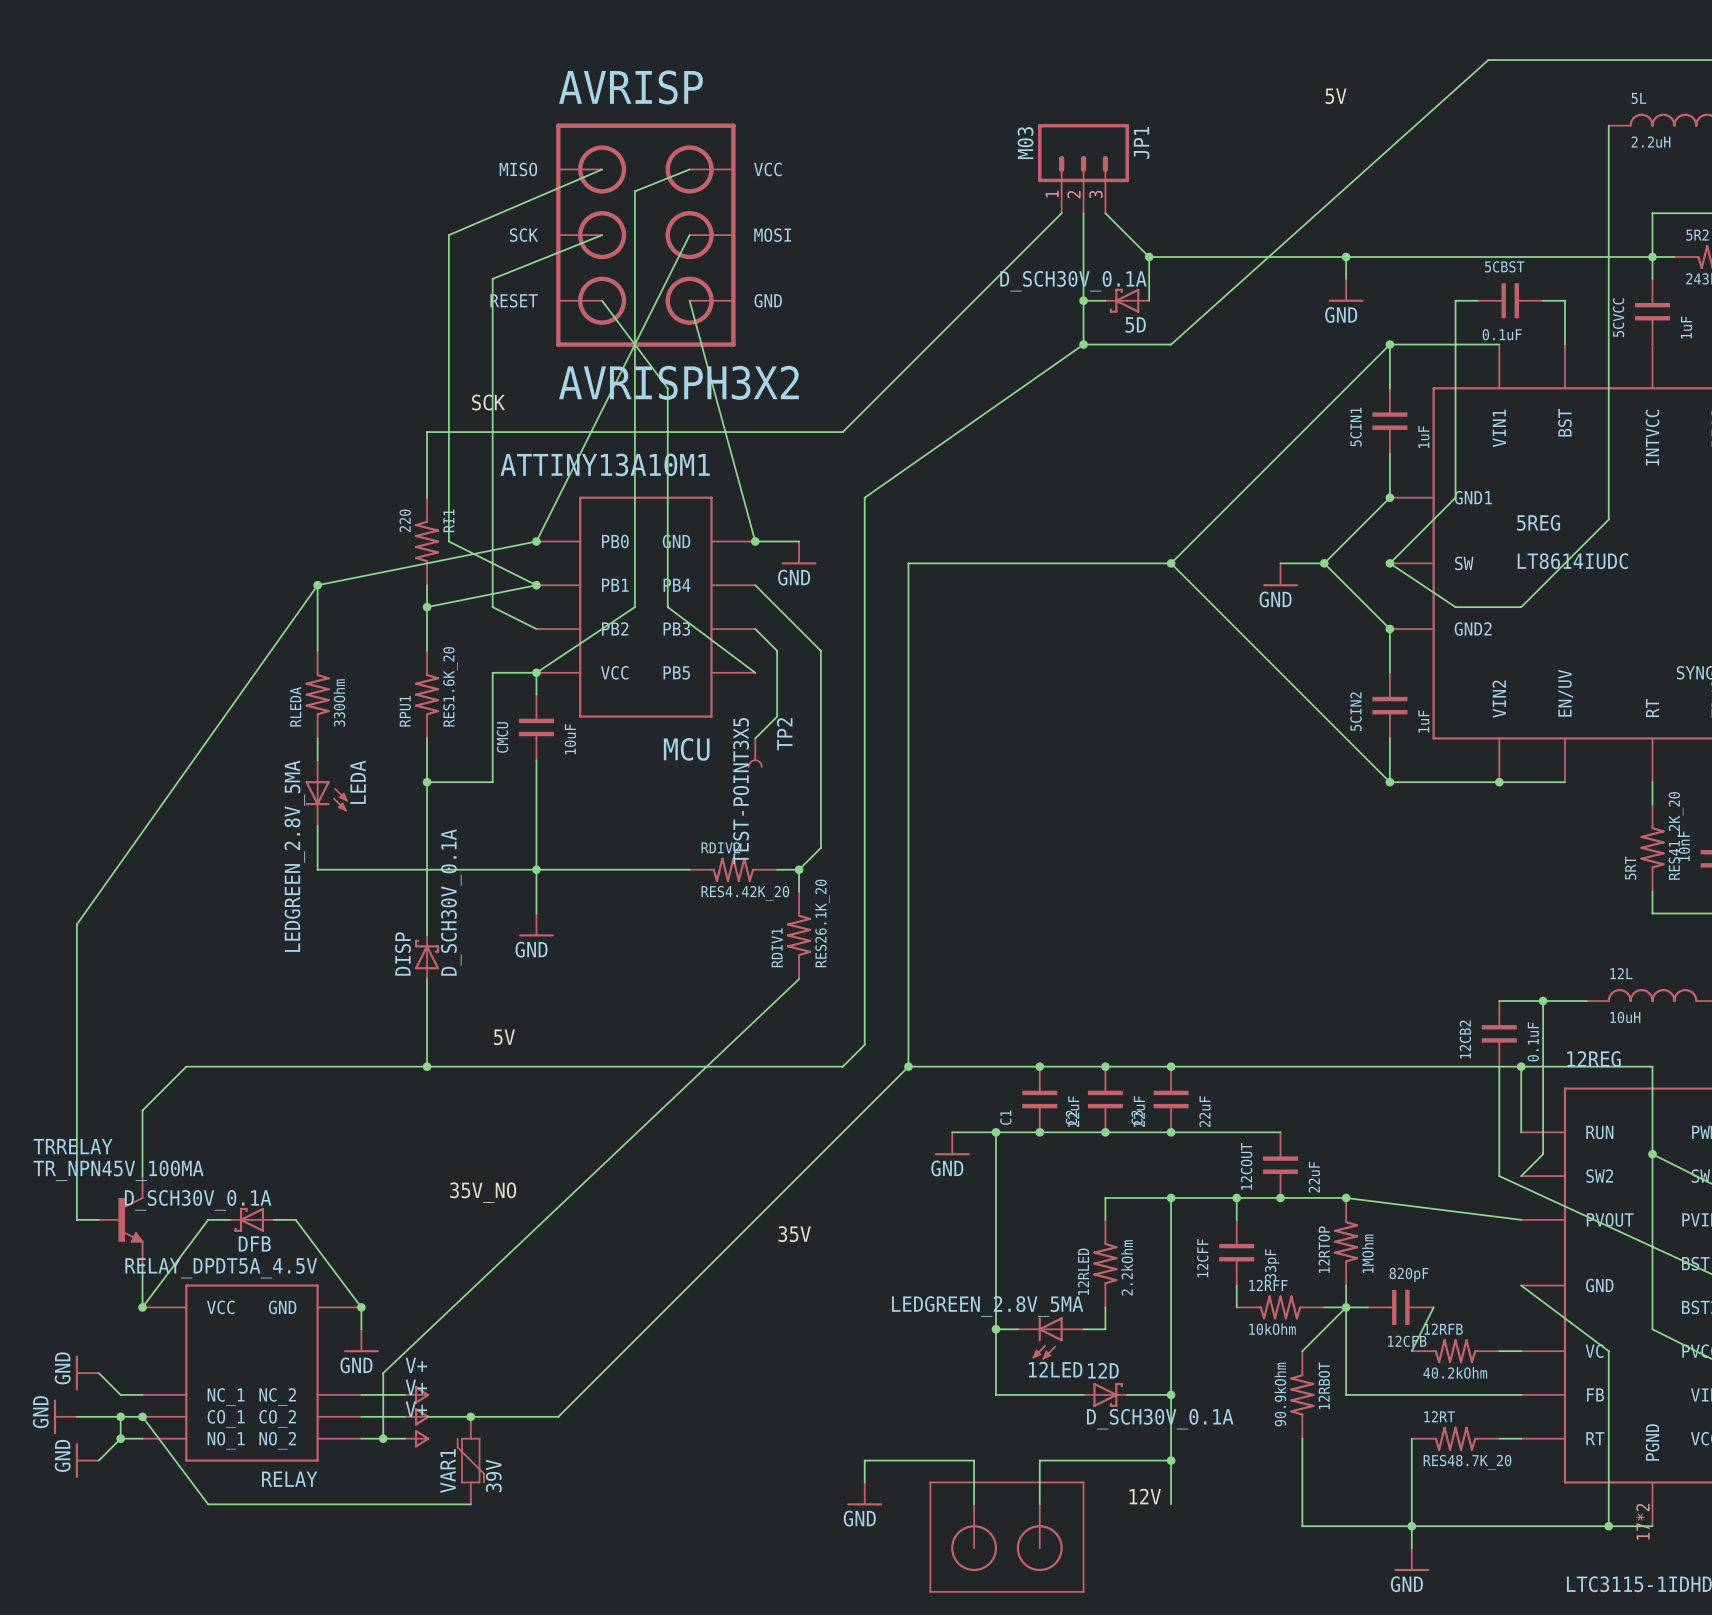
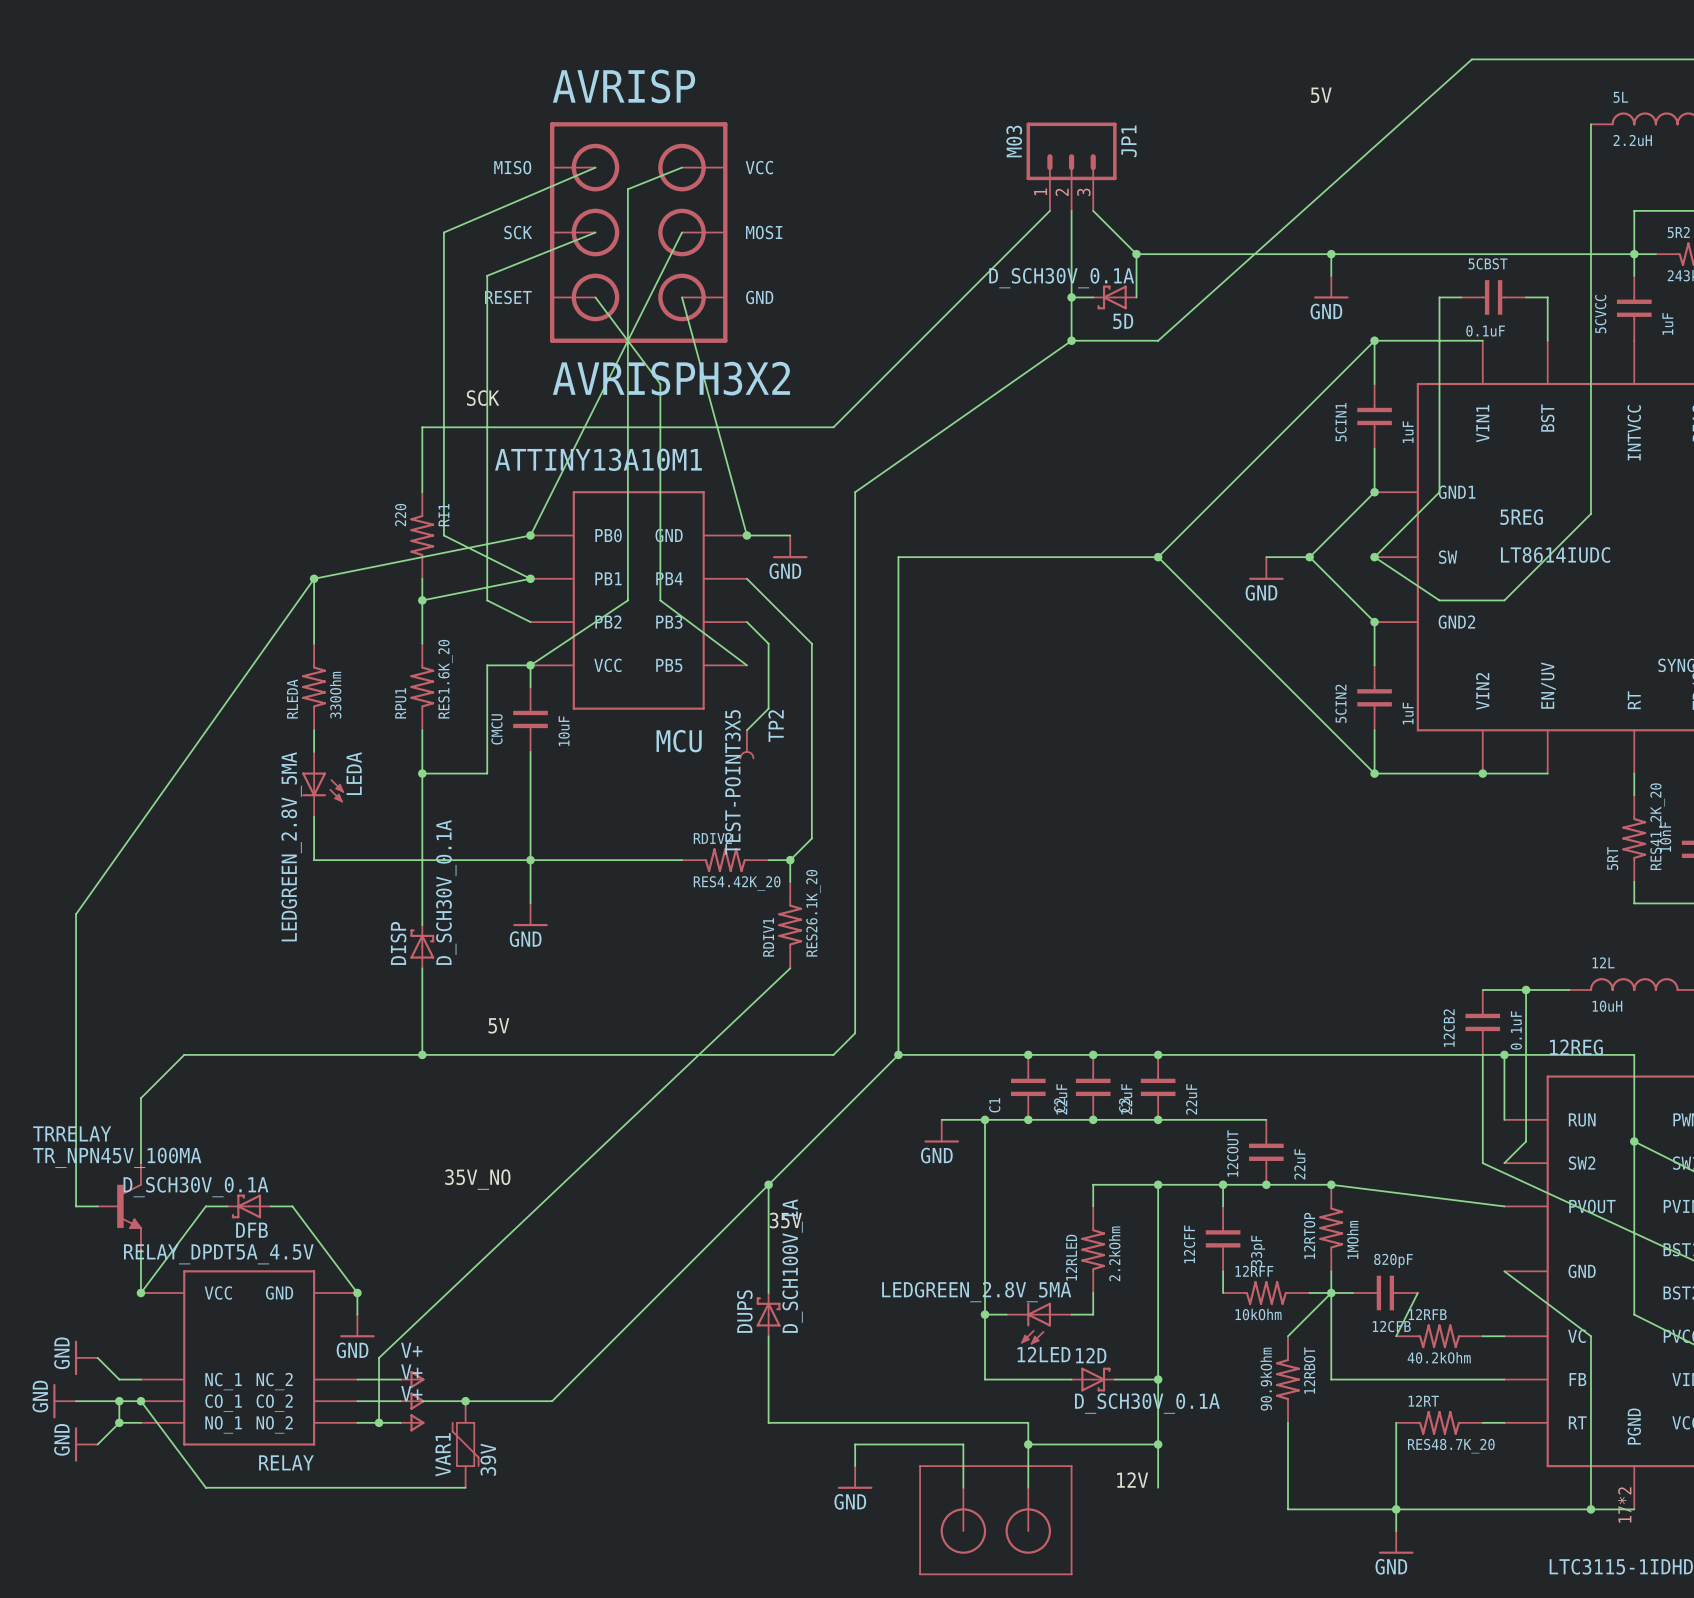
wire: none -> (768, 1184) (768, 1292)
junction: none -> (768, 1184)
DUPS: none -> D_SCH100V_1A (768, 1314)
wire: none -> (768, 1336) (768, 1422) (1028, 1422) (1028, 1444)
junction: none -> (1028, 1444)

